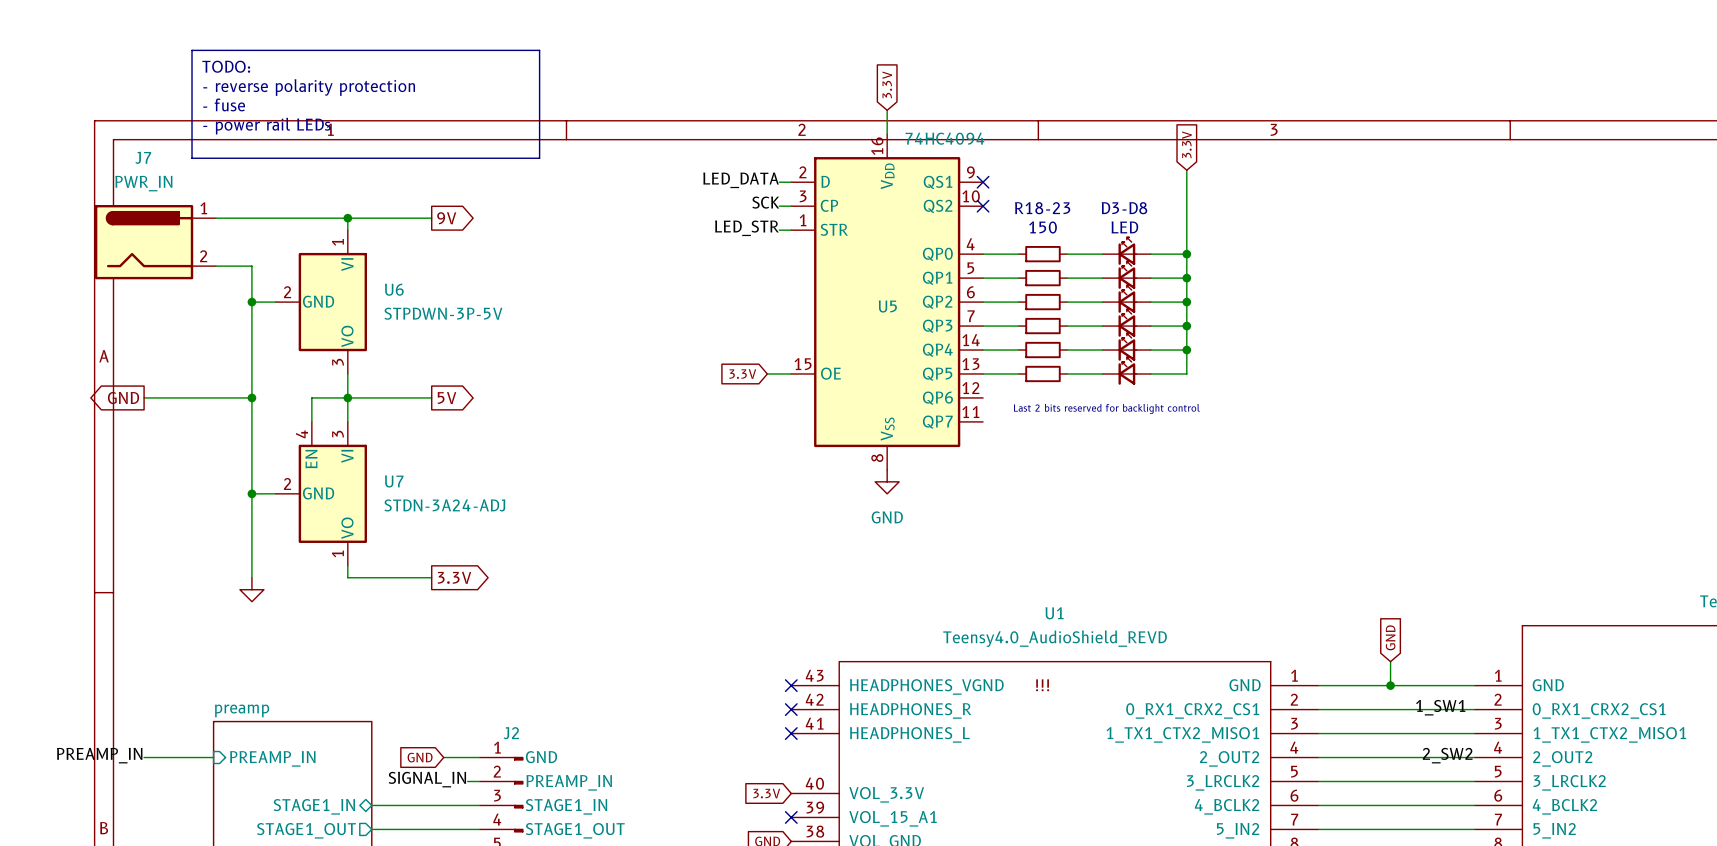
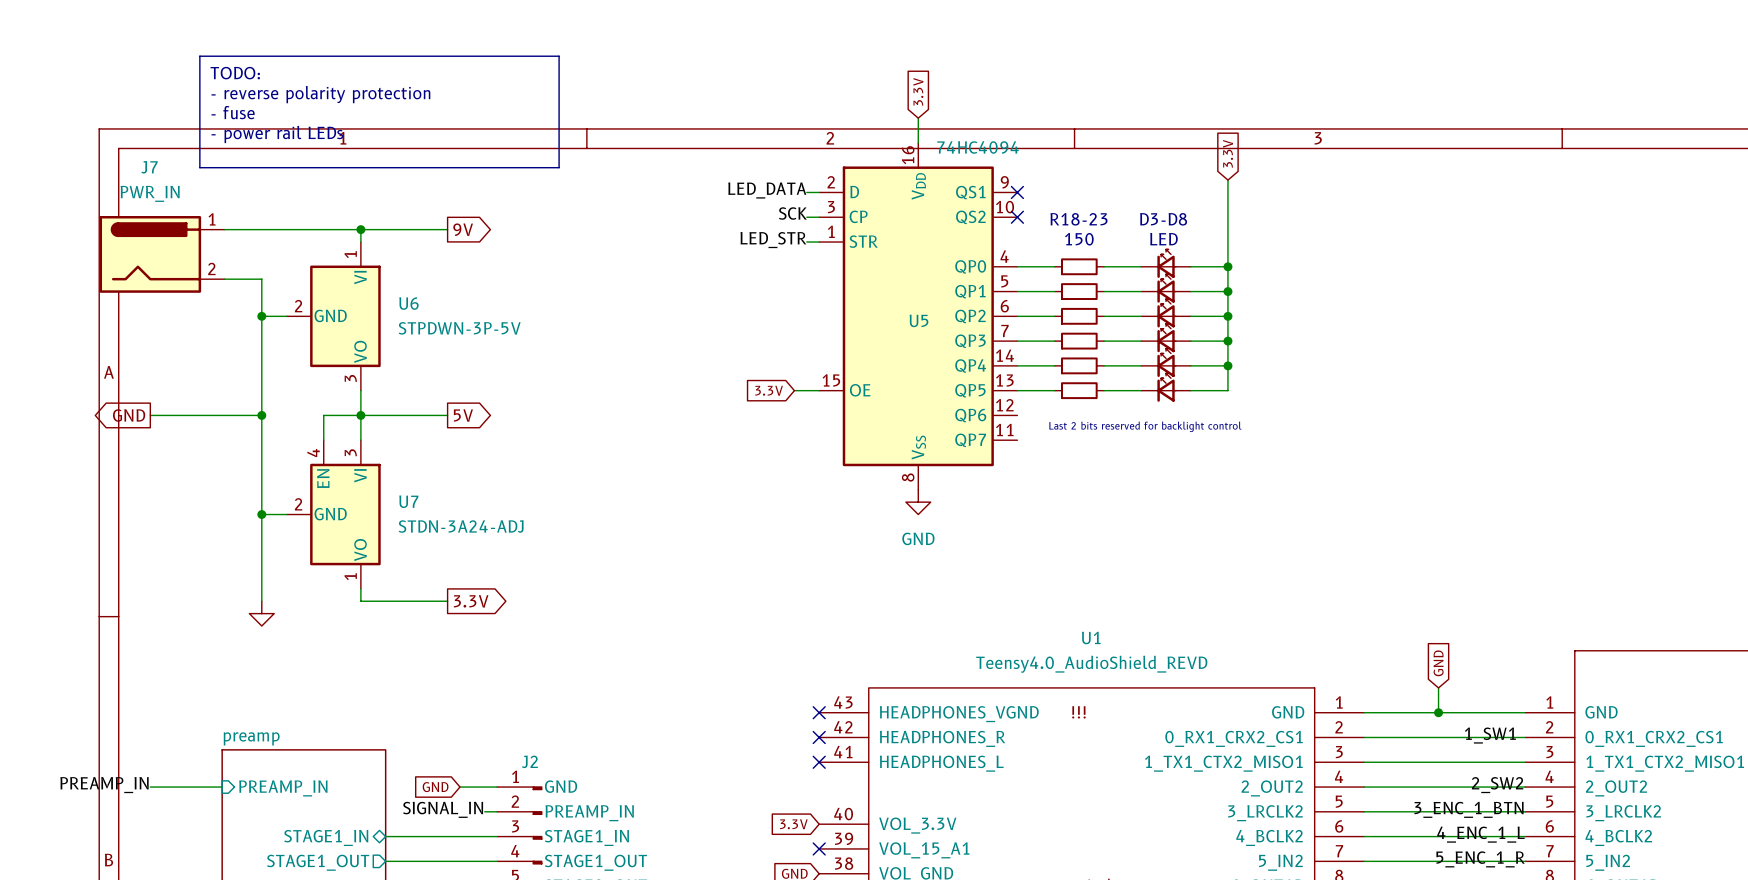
label: none -> 3_ENC_1_BTN (1469, 809)
label: none -> 4_ENC_1_L (1481, 834)
label: none -> 5_ENC_1_R (1480, 859)

